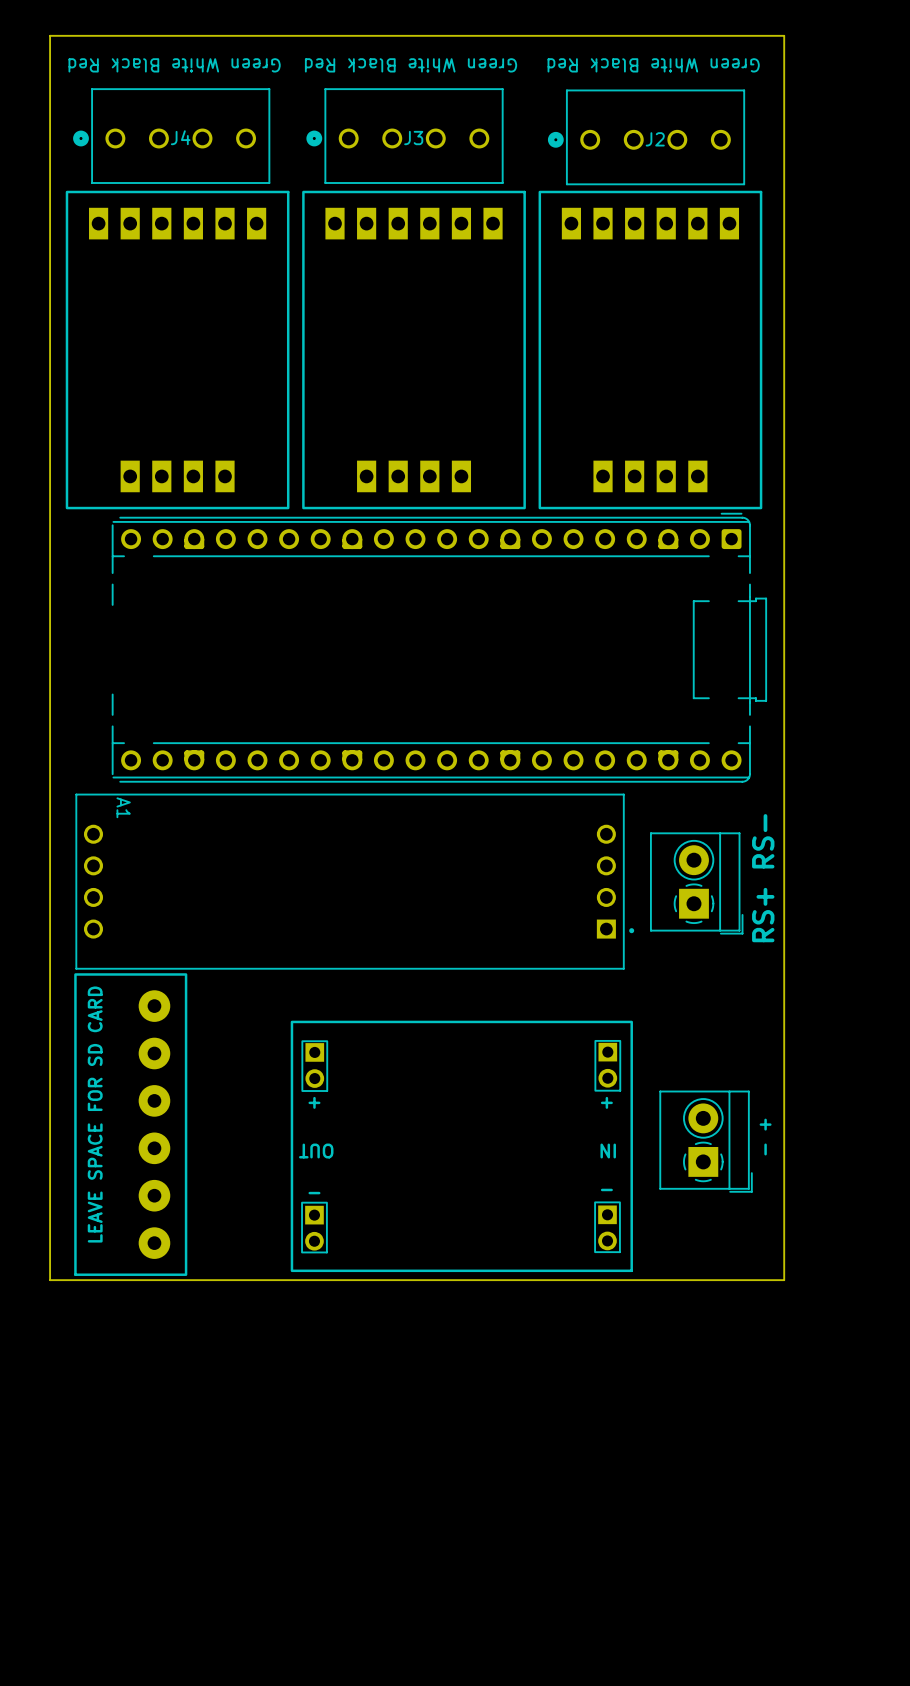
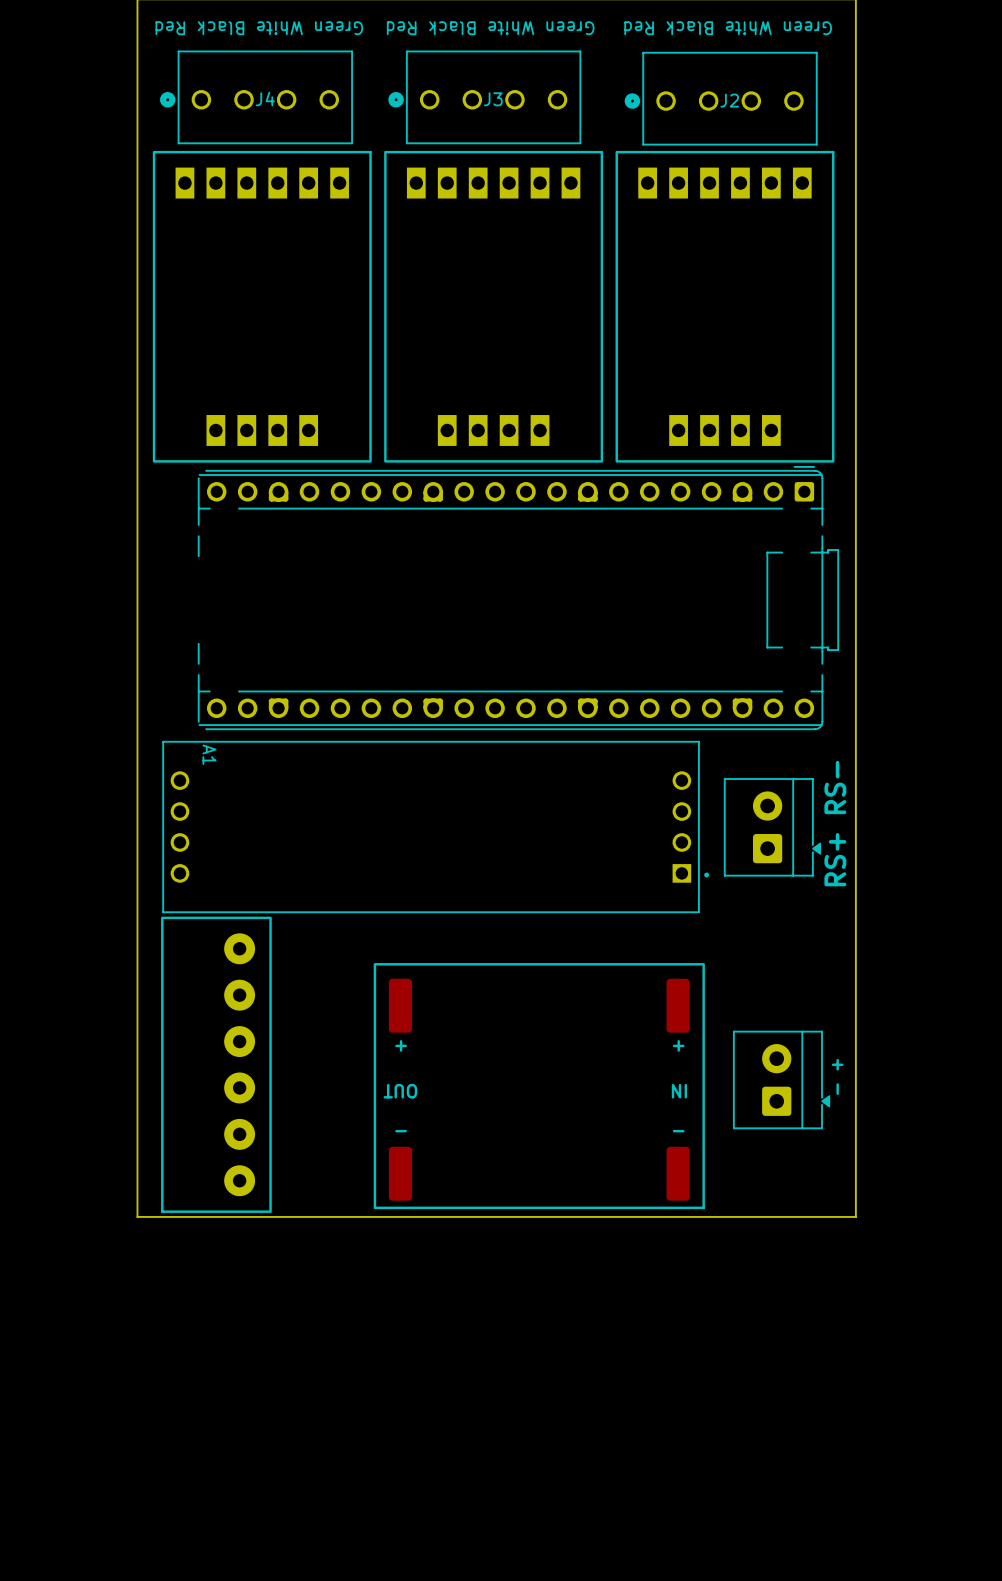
part footprint: [650, 832, 744, 935] -> [724, 778, 822, 877]
part footprint: [290, 1020, 633, 1273] -> [373, 963, 705, 1210]
part footprint: [659, 1090, 753, 1193] -> [733, 1030, 831, 1130]
text: LEAVE SPACE FOR SD CARD (95, 1114) -> none

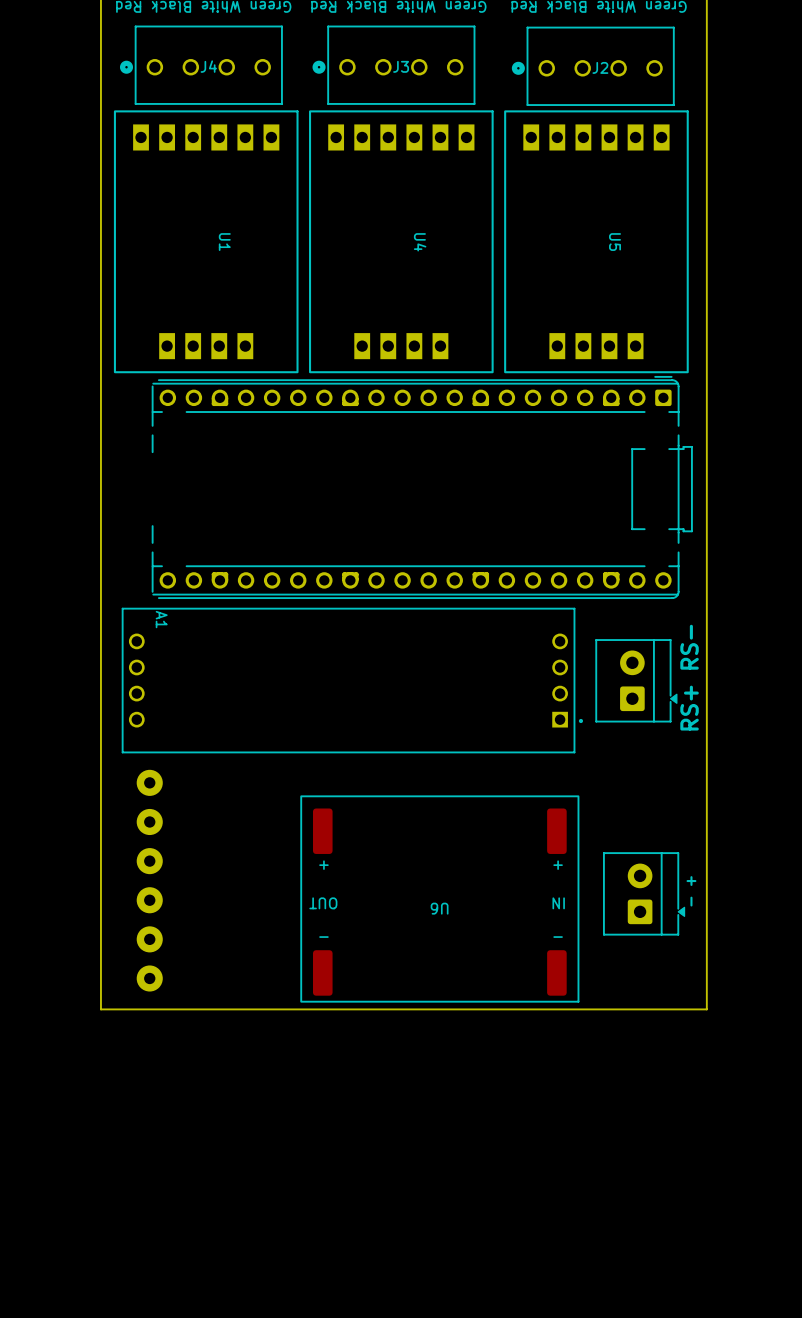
U1 name: none -> U1 (224, 242)
U4 name: none -> U4 (420, 242)
U5 name: none -> U5 (615, 242)
part side: top (216, 1064) -> bottom (149, 880)
part: (539, 1086) -> none
U6: none -> (439, 899)

